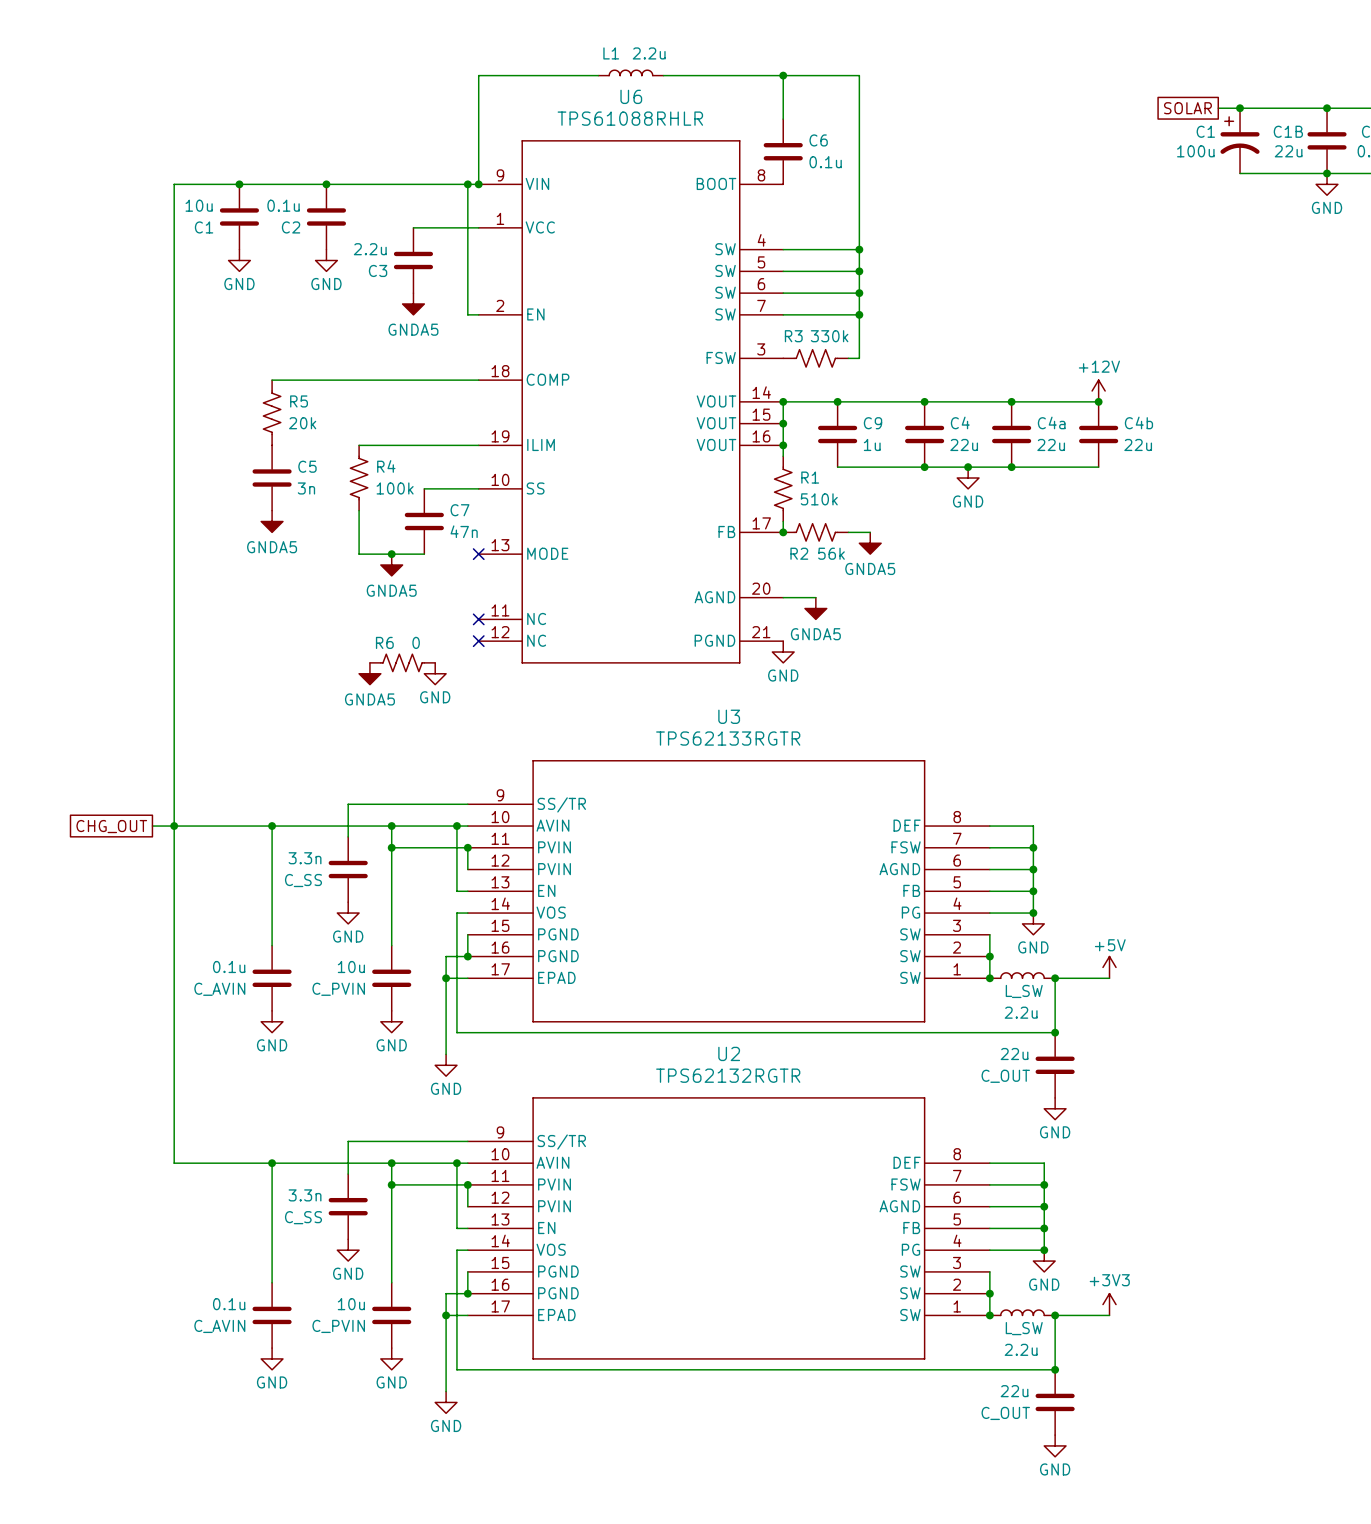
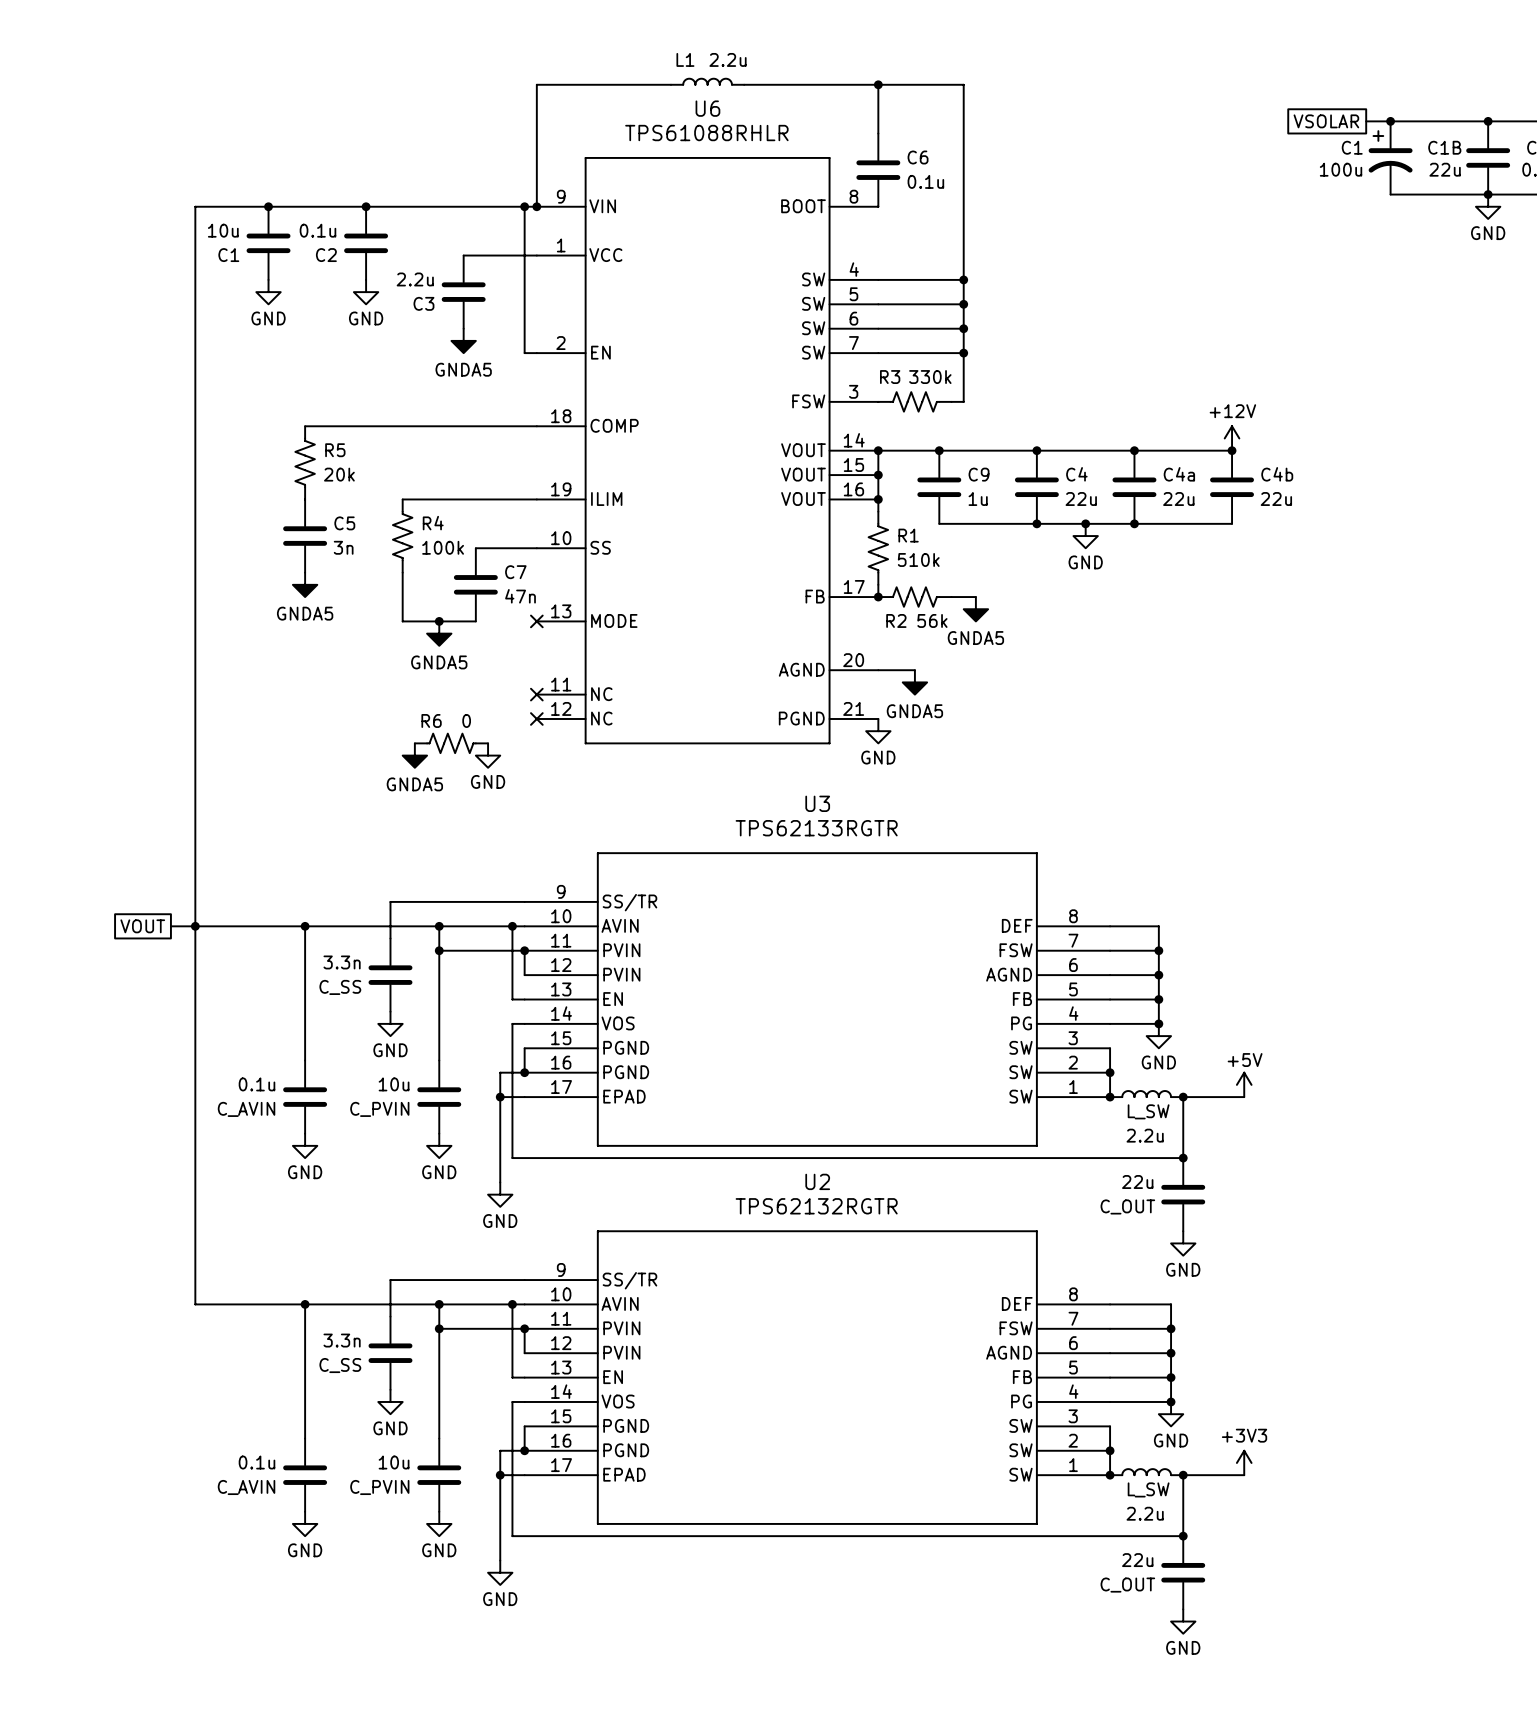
global label: SOLAR (1187, 108) -> VSOLAR (1326, 121)
global label: CHG_OUT (111, 826) -> VOUT (142, 926)

